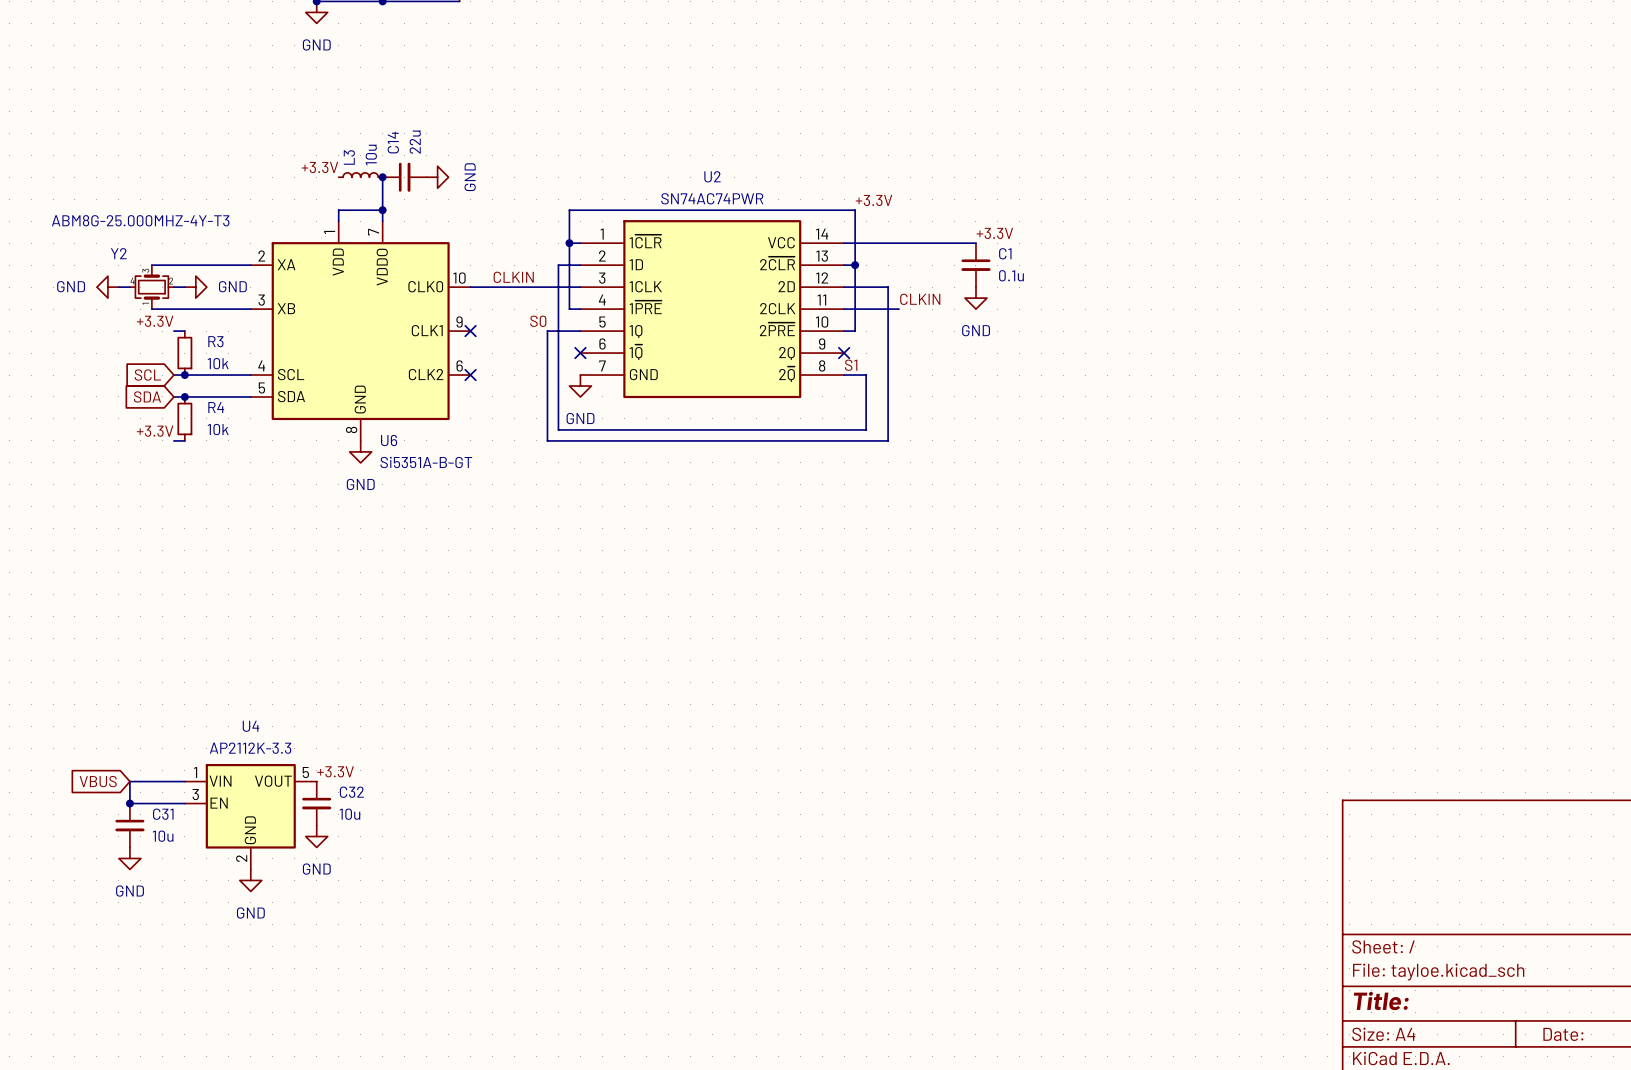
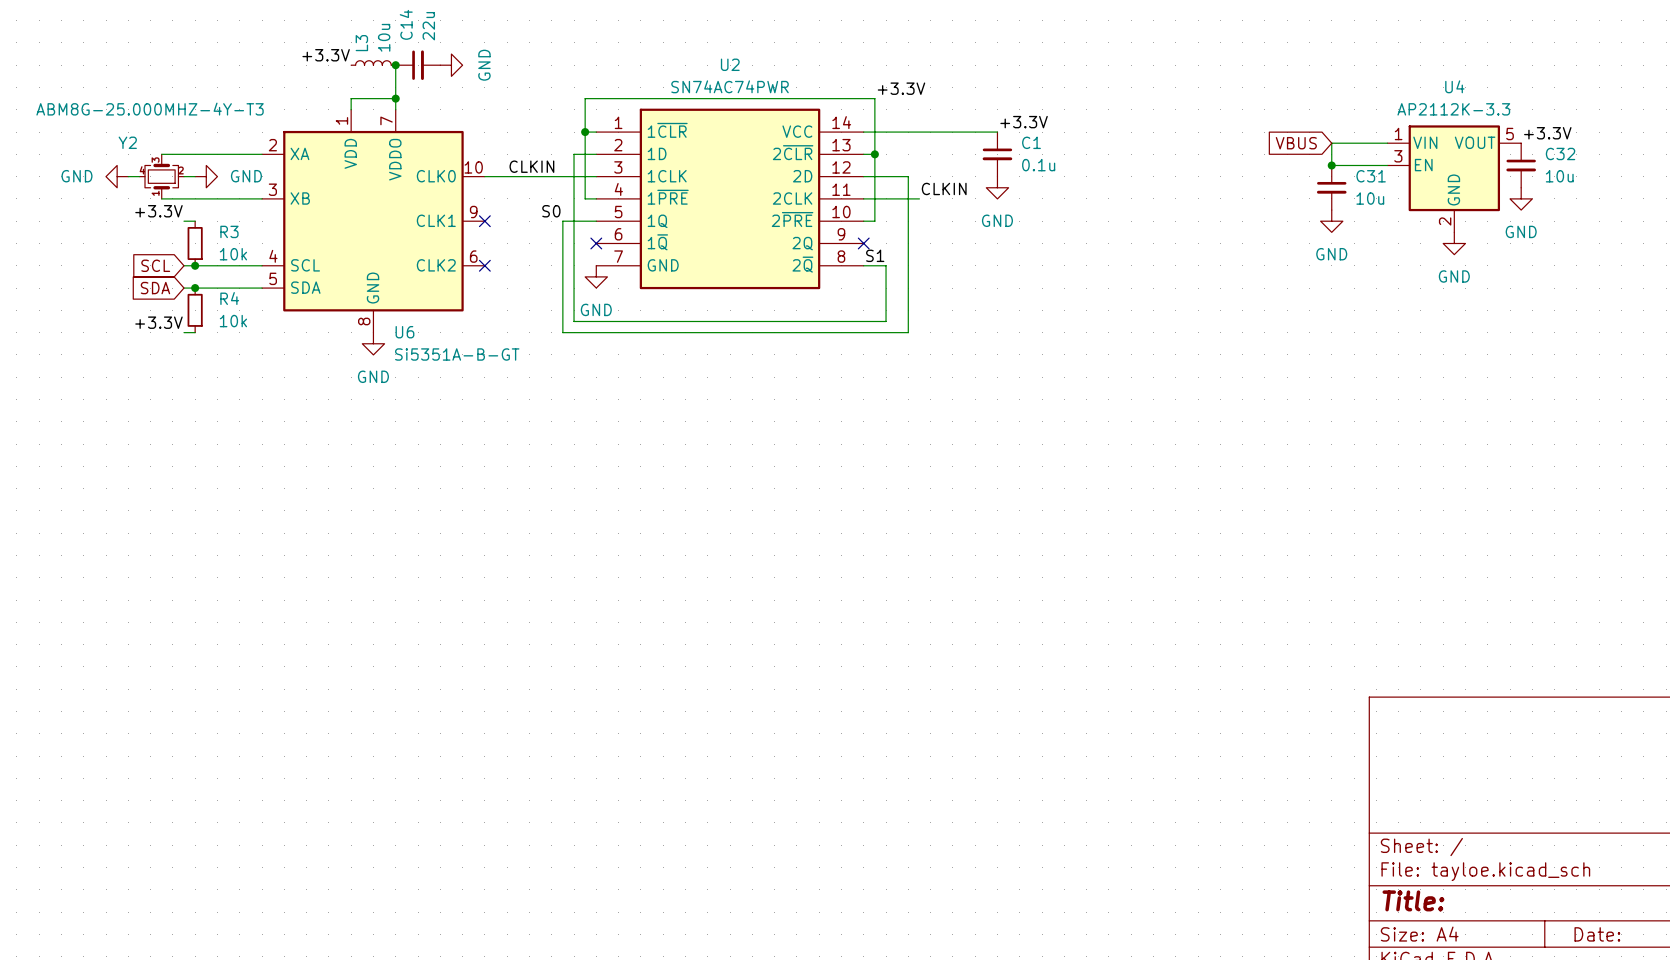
label: none -> +3.3V (1547, 133)
global label: none -> VBUS (1296, 143)
wire: none -> (1387, 143) (1331, 143) (1331, 165) (1387, 165)
junction: none -> (1331, 165)
power symbol: none -> GND (1521, 198)
power symbol: none -> GND (1331, 221)
power symbol: none -> GND (1454, 243)
label: +3.3V (335, 771) -> none
global label: VBUS (98, 781) -> none
wire: (184, 781) (129, 781) (129, 803) (184, 803) -> none
junction: (129, 803) -> none
C32 position: (316, 803) -> (1521, 165)
U4 position: (250, 816) -> (1454, 178)
C31 position: (129, 825) -> (1331, 187)
power symbol: GND (316, 836) -> none
power symbol: GND (129, 858) -> none
power symbol: GND (250, 880) -> none

